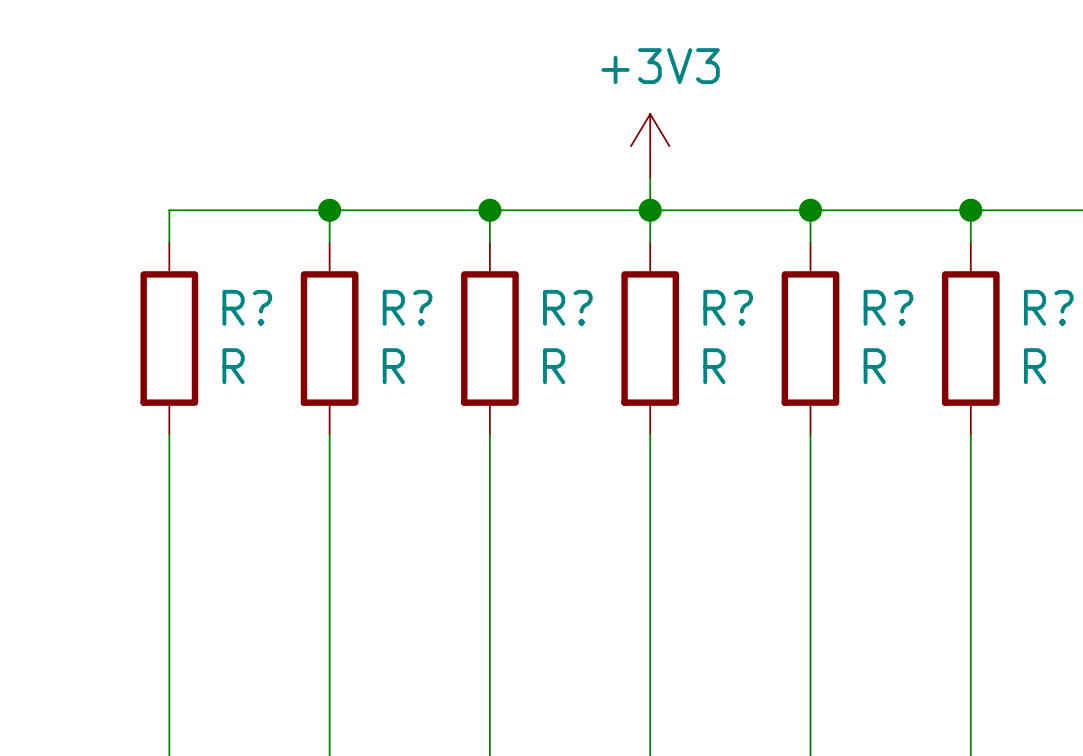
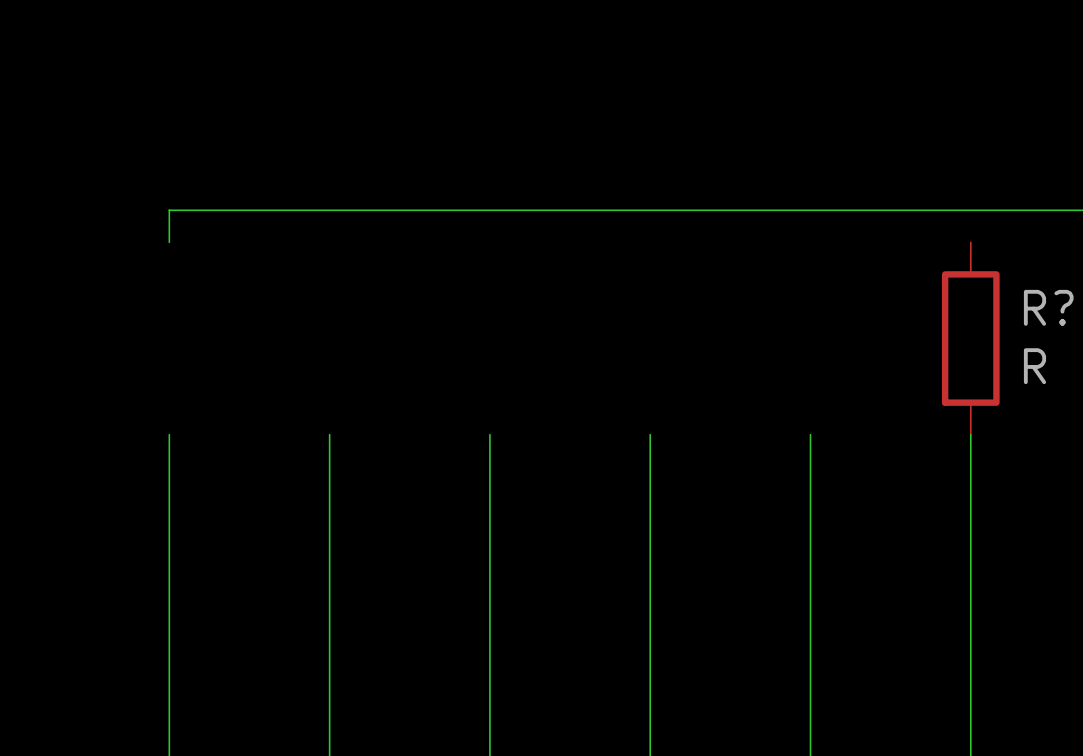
power symbol: +3V3 (650, 146) -> none
wire: (650, 178) (650, 242) -> none
wire: (329, 210) (329, 242) -> none
junction: (329, 210) -> none
wire: (489, 210) (489, 242) -> none
junction: (489, 210) -> none
junction: (650, 210) -> none
wire: (810, 210) (810, 242) -> none
junction: (810, 210) -> none
wire: (970, 210) (970, 242) -> none
junction: (970, 210) -> none
R?: R (169, 338) -> none
R?: R (329, 338) -> none
R?: R (489, 338) -> none
R?: R (650, 338) -> none
R?: R (810, 338) -> none

